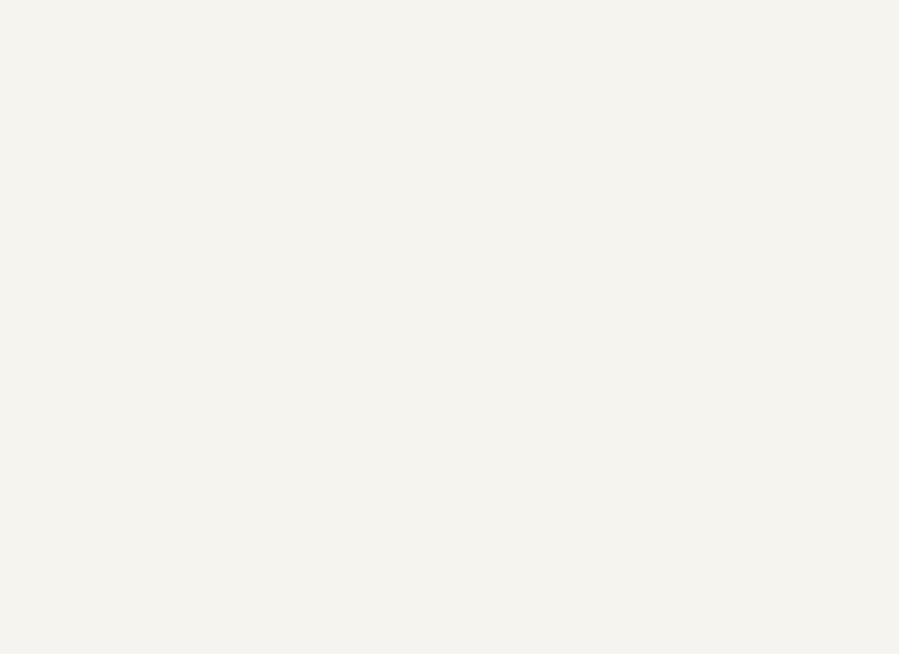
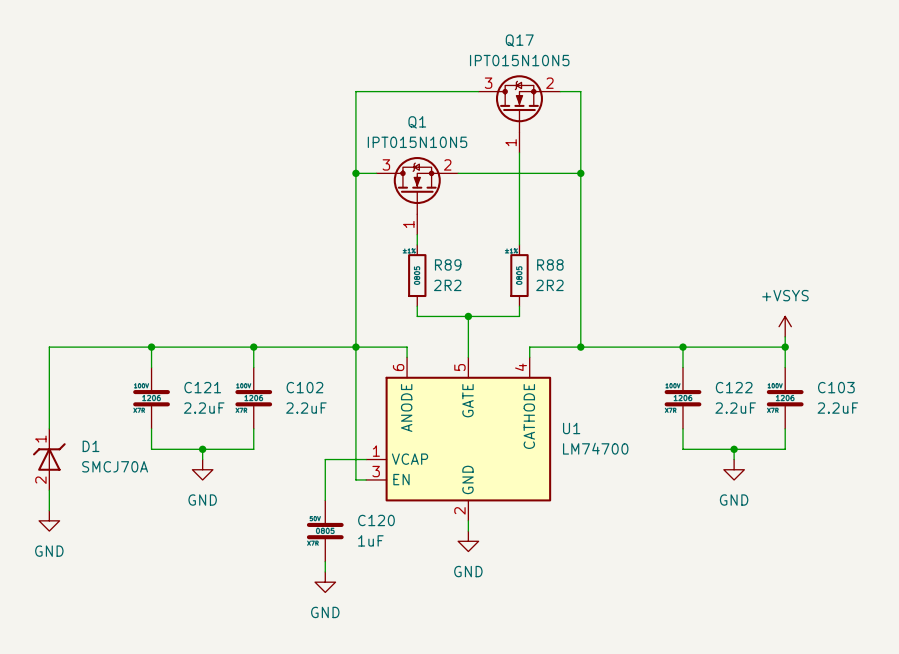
wire: none -> (478, 91) (355, 91) (355, 479) (366, 479)
wire: none -> (560, 91) (580, 91) (580, 347)
Q17: none -> IPT015N10N5 (519, 114)
wire: none -> (519, 152) (519, 244)
wire: none -> (355, 173) (376, 173)
junction: none -> (355, 173)
wire: none -> (458, 173) (580, 173)
junction: none -> (580, 173)
Q1: none -> IPT015N10N5 (417, 195)
wire: none -> (417, 234) (417, 244)
R89: none -> 2R2 (417, 275)
R88: none -> 2R2 (519, 275)
wire: none -> (417, 306) (417, 316) (519, 316) (519, 306)
wire: none -> (468, 316) (468, 357)
junction: none -> (468, 316)
power symbol: none -> +VSYS (785, 326)
wire: none -> (785, 336) (785, 367)
wire: none -> (151, 347) (151, 367)
junction: none -> (151, 347)
wire: none -> (253, 347) (253, 367)
junction: none -> (253, 347)
junction: none -> (355, 347)
junction: none -> (580, 347)
wire: none -> (683, 347) (683, 367)
junction: none -> (683, 347)
wire: none -> (785, 347) (529, 347) (529, 357)
junction: none -> (785, 347)
wire: none -> (407, 357) (407, 347) (49, 347) (49, 428)
C121: none -> 2.2uF (151, 398)
C102: none -> 2.2uF (253, 398)
C122: none -> 2.2uF (683, 398)
C103: none -> 2.2uF (785, 398)
wire: none -> (151, 428) (151, 449) (253, 449) (253, 428)
wire: none -> (683, 428) (683, 449) (785, 449) (785, 428)
U1: none -> LM74700 (458, 439)
wire: none -> (202, 449) (202, 459)
junction: none -> (202, 449)
wire: none -> (734, 449) (734, 459)
junction: none -> (734, 449)
D1: none -> SMCJ70A (49, 459)
wire: none -> (366, 459) (325, 459) (325, 500)
power symbol: none -> GND (202, 469)
power symbol: none -> GND (734, 469)
wire: none -> (49, 490) (49, 510)
power symbol: none -> GND (49, 520)
wire: none -> (468, 520) (468, 531)
C120: none -> 1uF (325, 531)
power symbol: none -> GND (468, 541)
wire: none -> (325, 561) (325, 571)
power symbol: none -> GND (325, 582)

